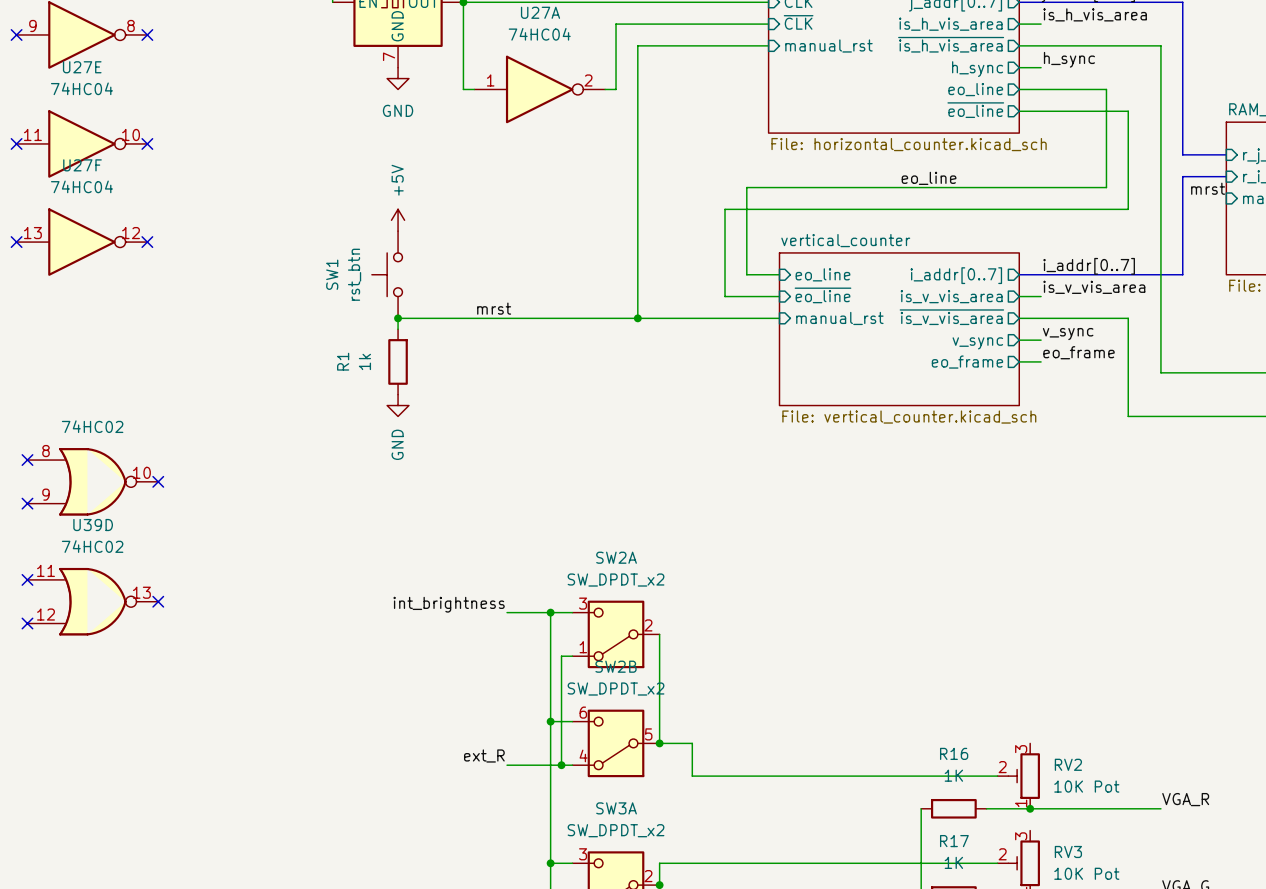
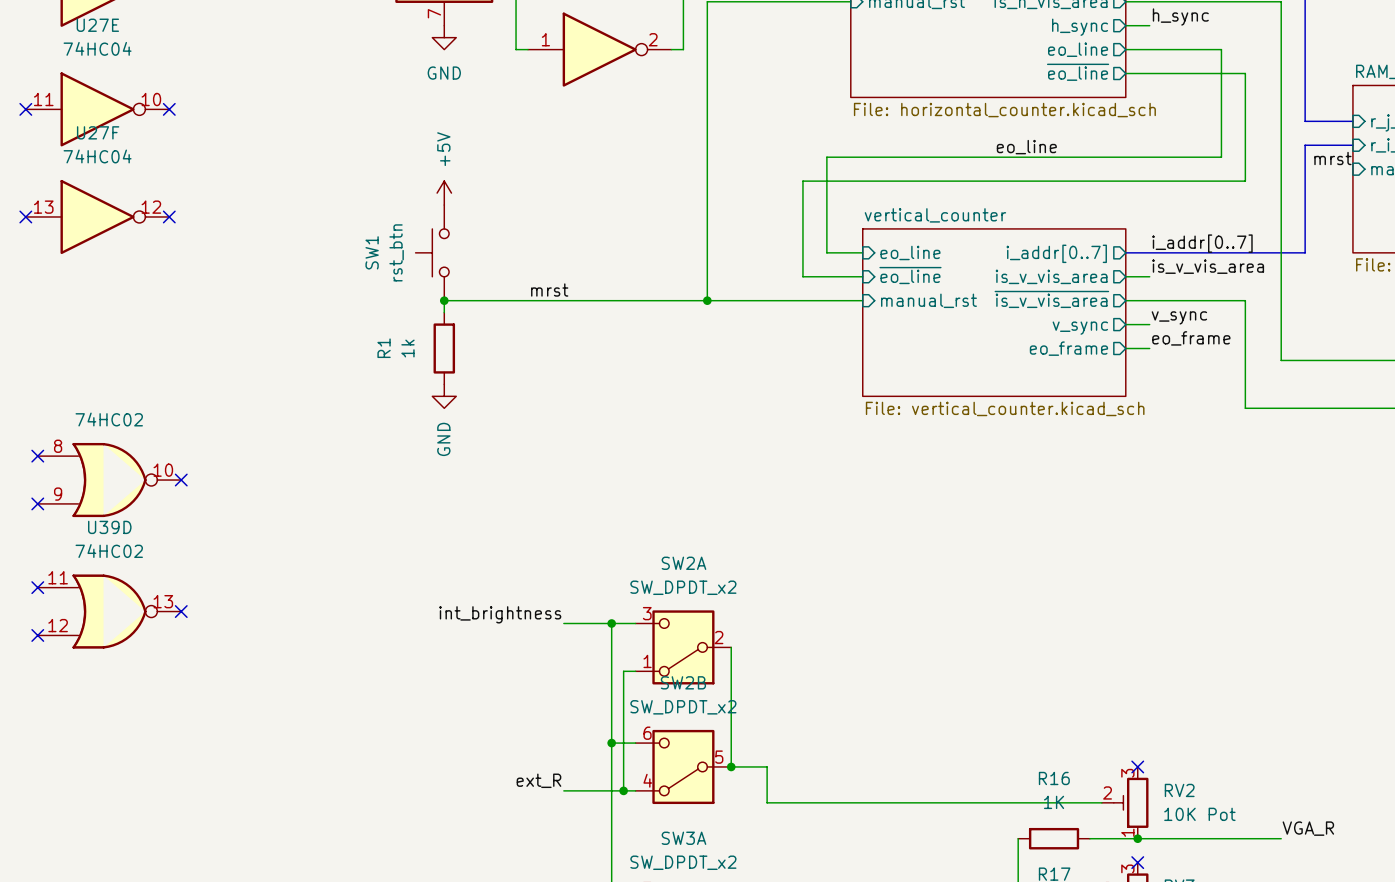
no-connect mark: none -> (1137, 766)
no-connect mark: none -> (1137, 862)

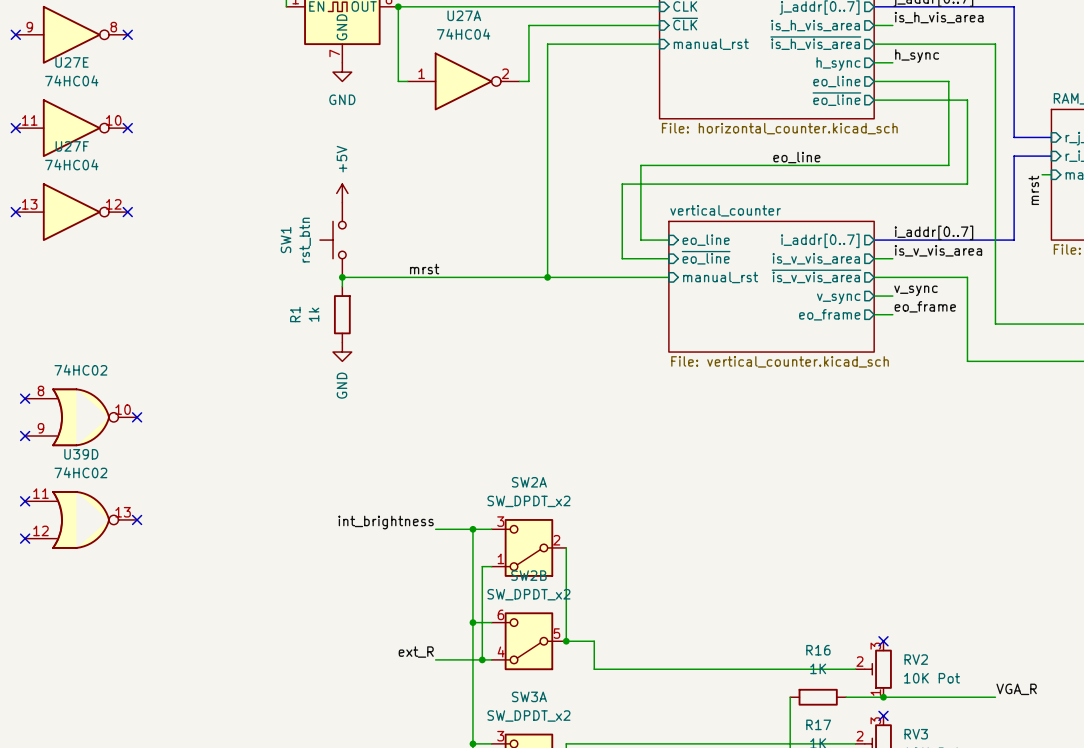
label rotation: 0° (1332, 158) -> 90° counterclockwise (1033, 190)
wire: none -> (1042, 174) (1051, 174)

